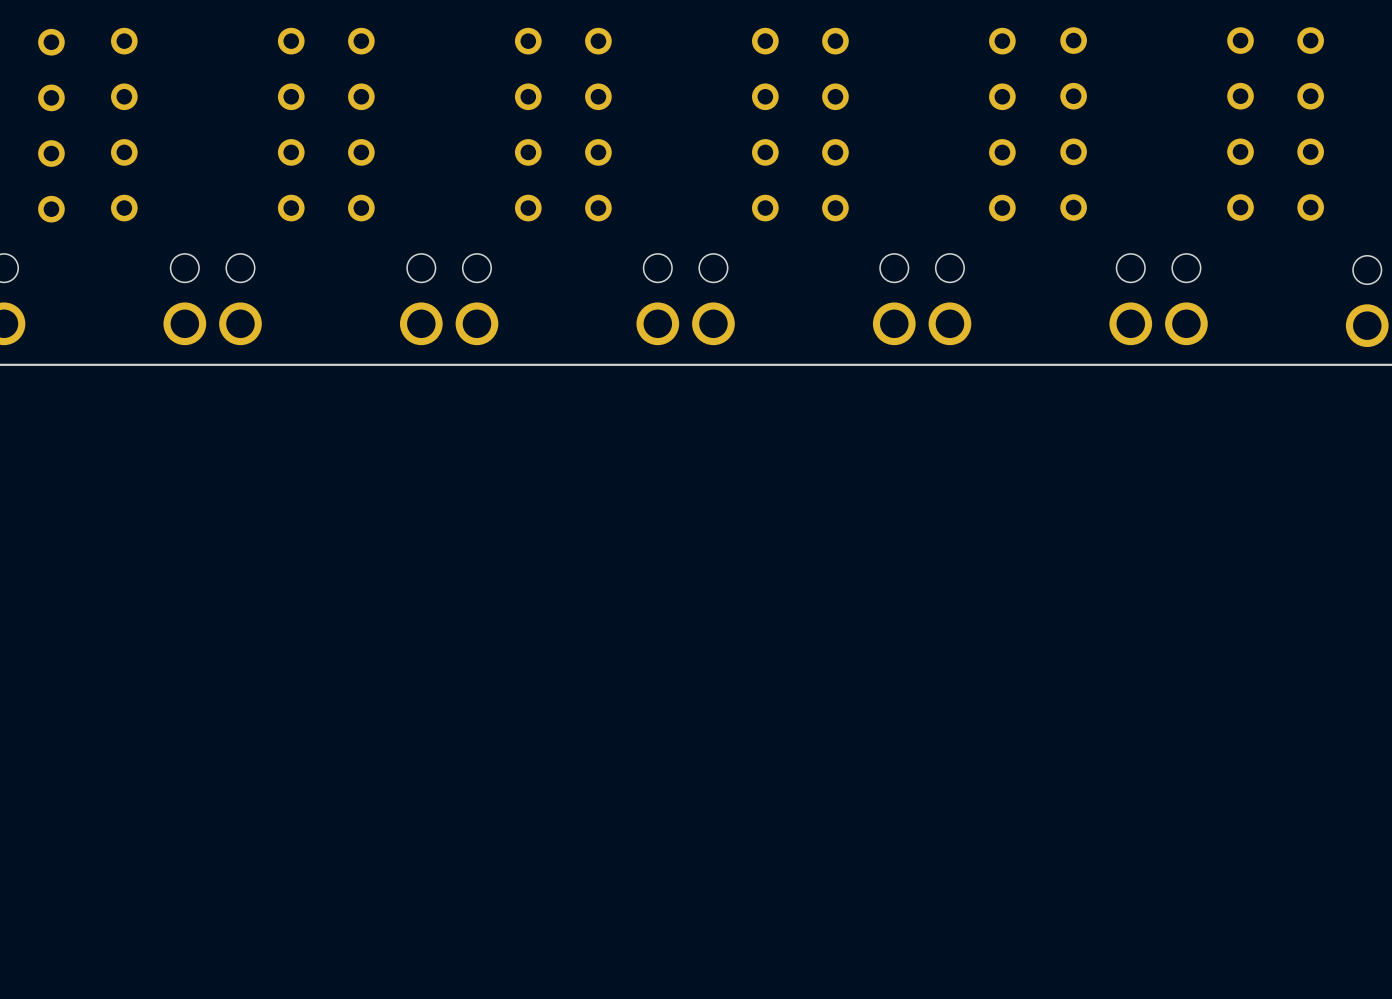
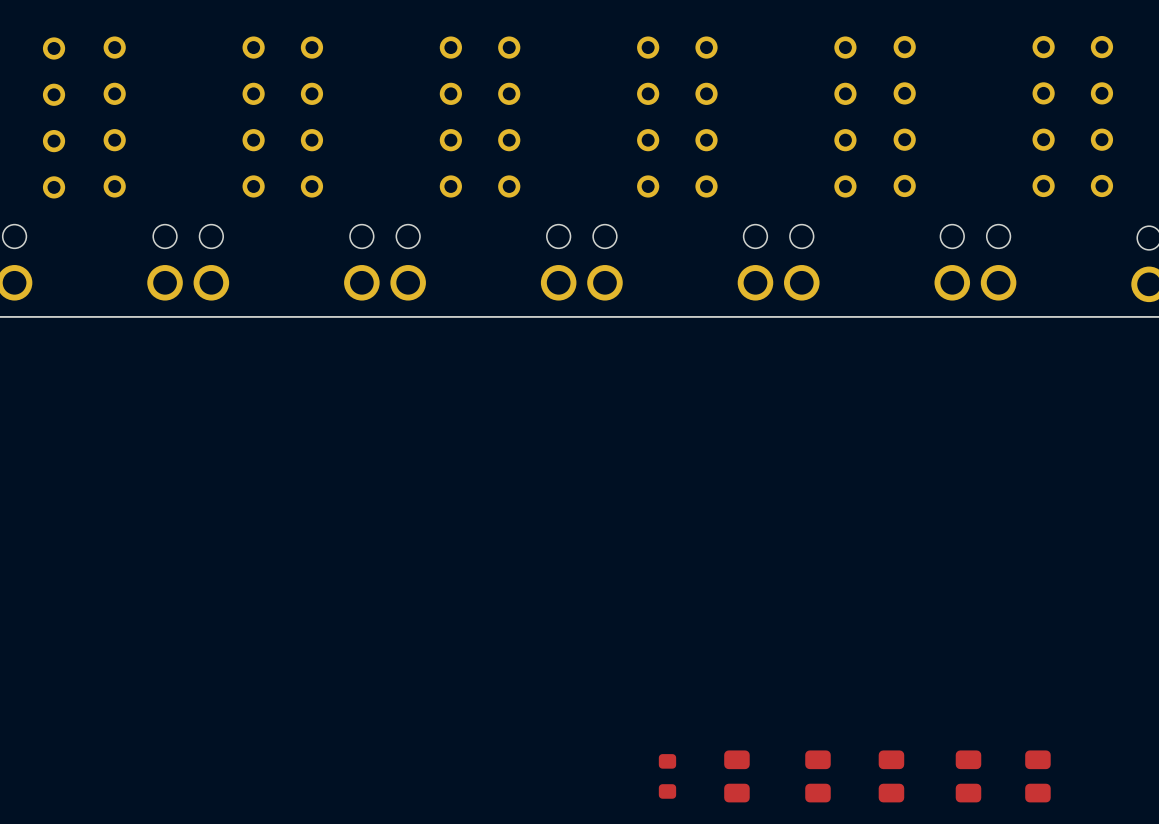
part: none -> (667, 776)
part: none -> (736, 776)
part: none -> (817, 776)
part: none -> (891, 776)
part: none -> (968, 776)
part: none -> (1037, 776)

